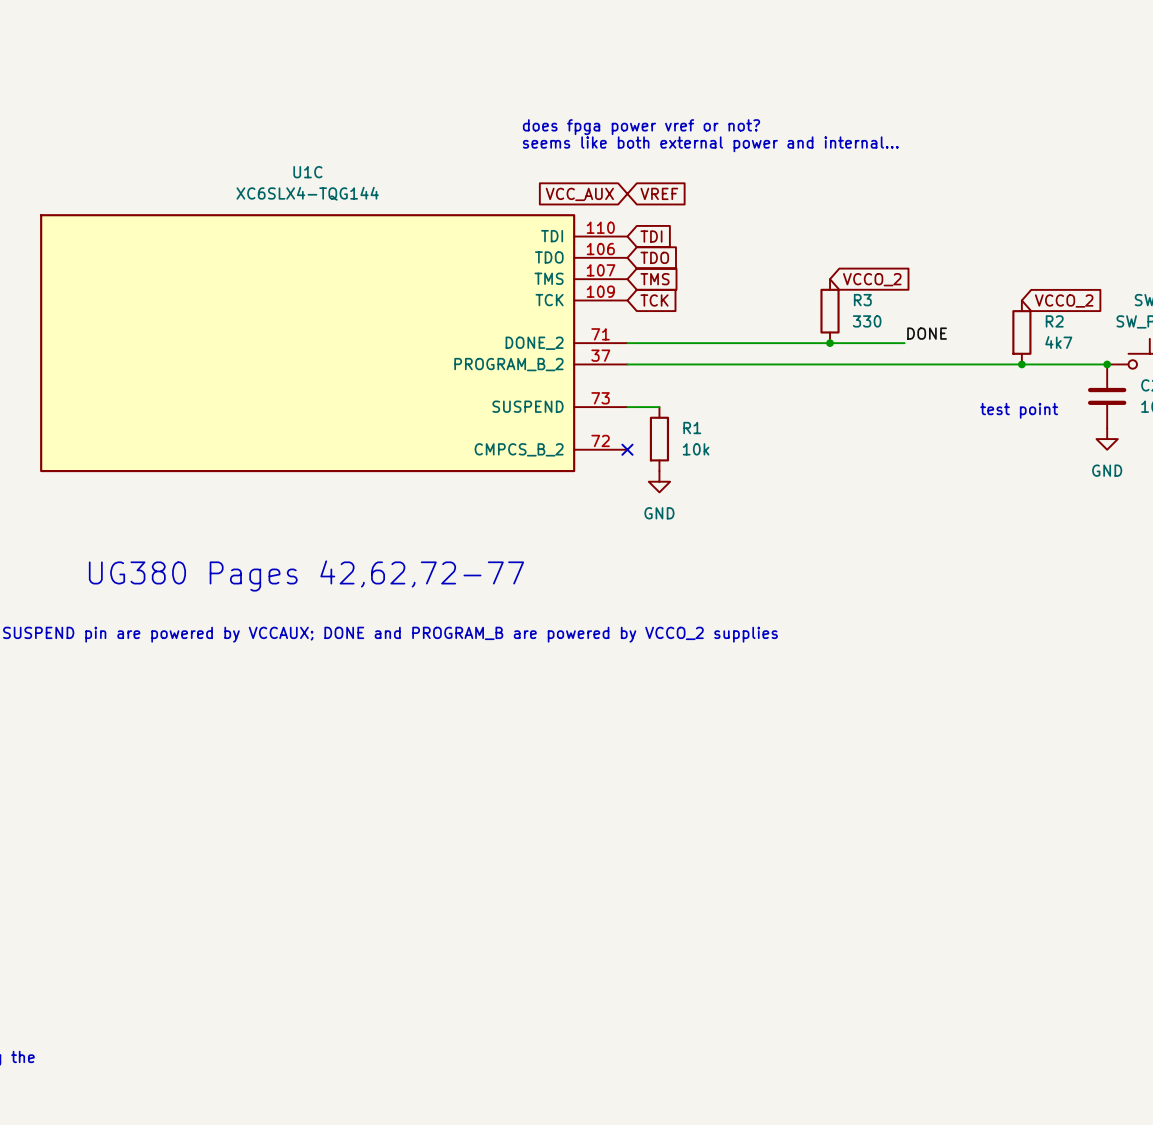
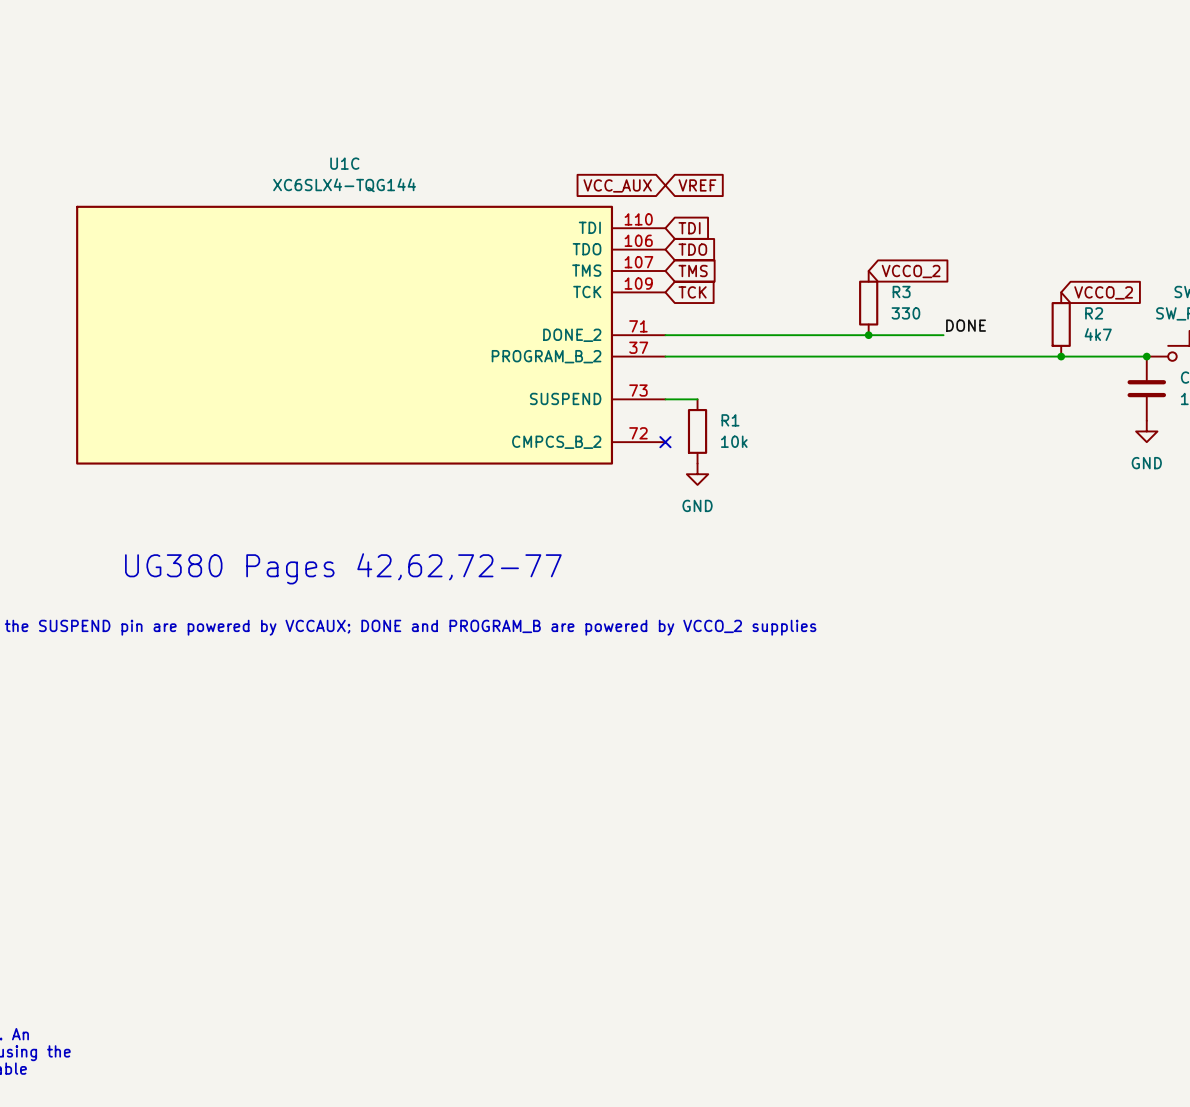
text: does fpga power vref or not? (641, 127) -> none
text: seems like both external power and internal... (710, 144) -> none
text: test point (1019, 410) -> none

